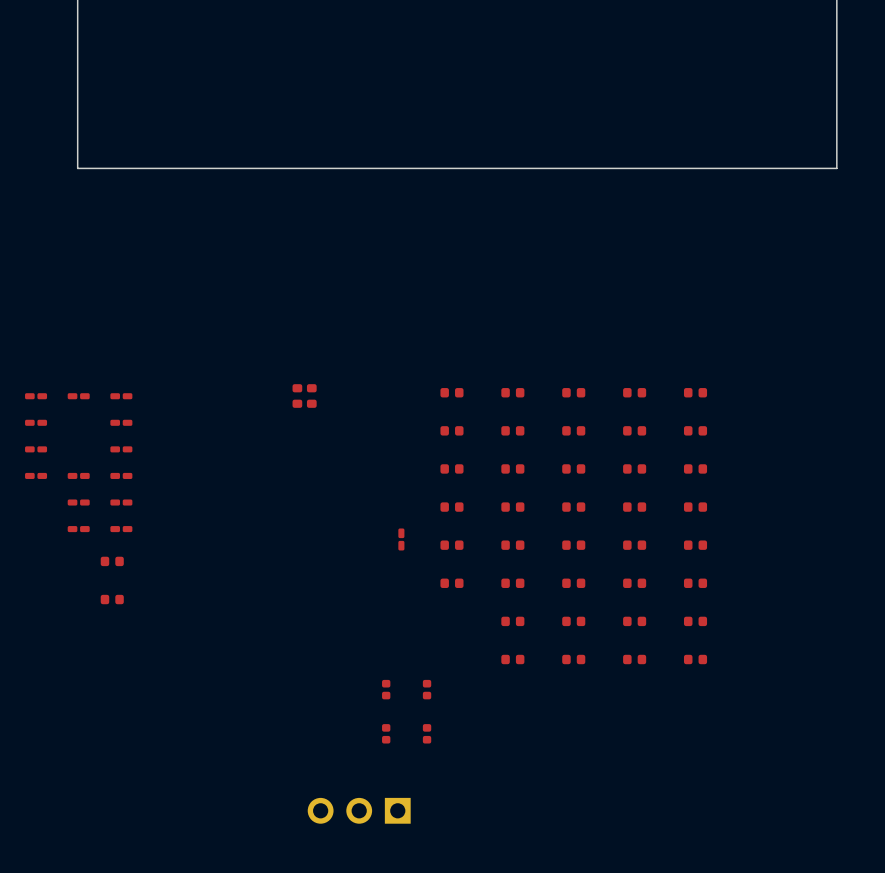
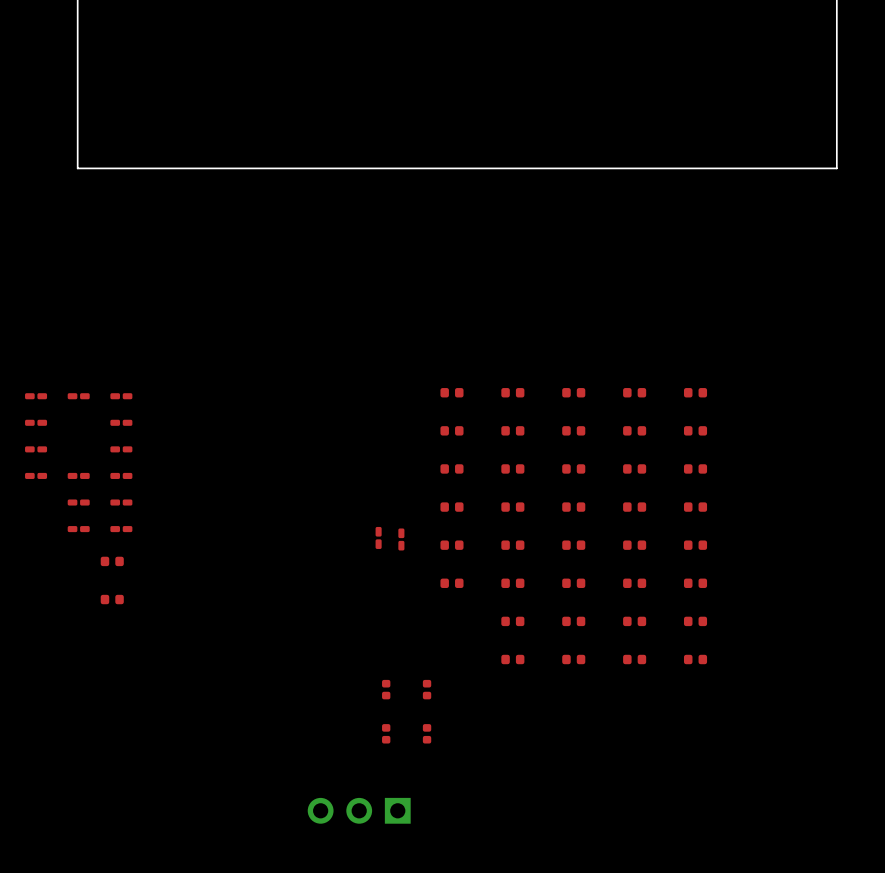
part: (297, 396) -> none
part: (311, 396) -> none
part: none -> (378, 537)

